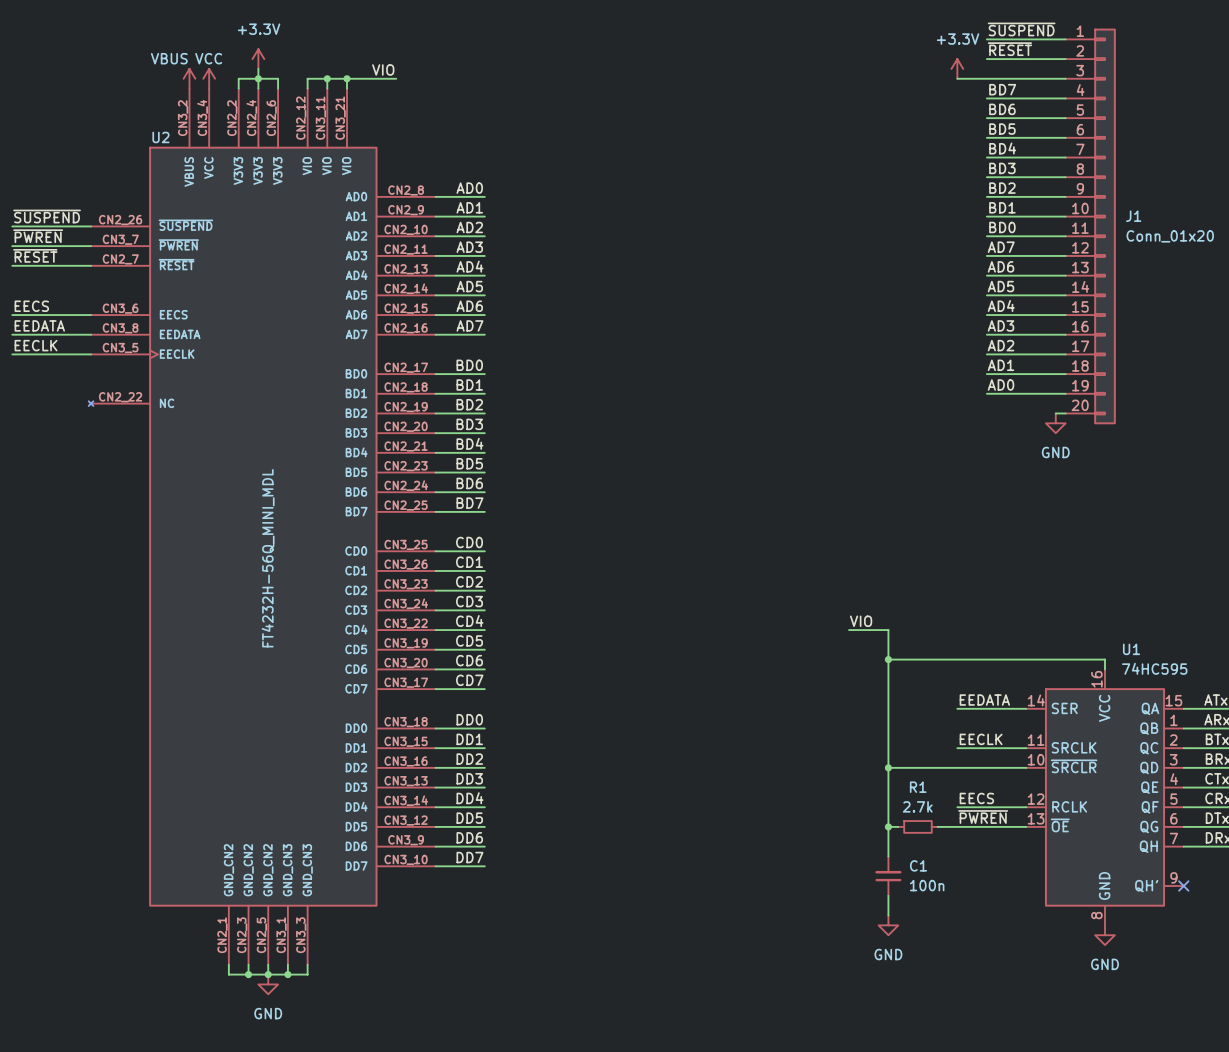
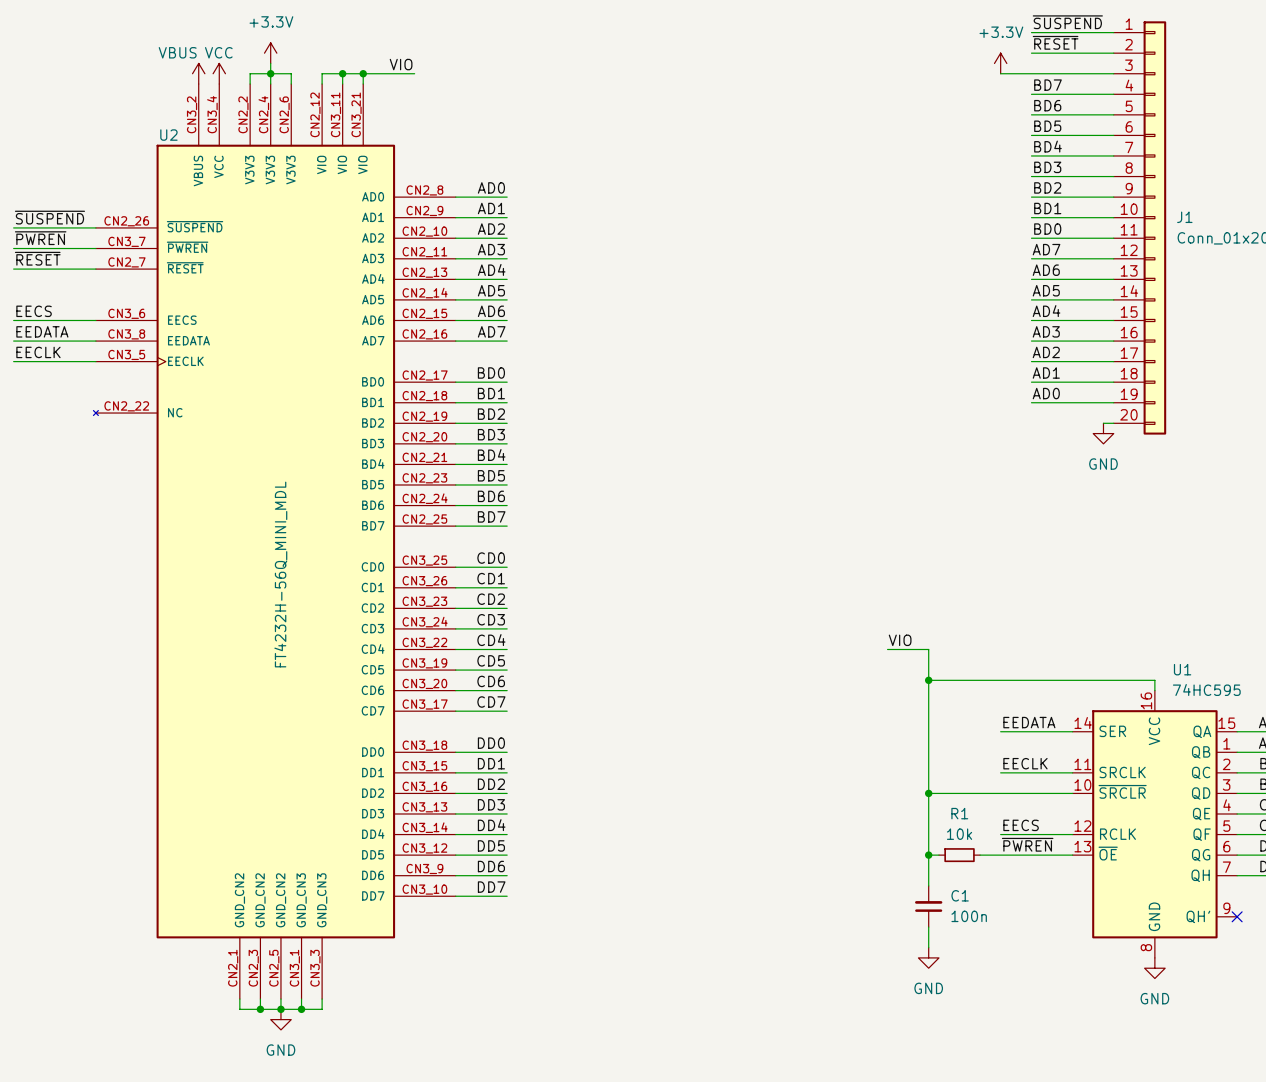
R1 value: 2.7k (917, 806) -> 10k (959, 834)

